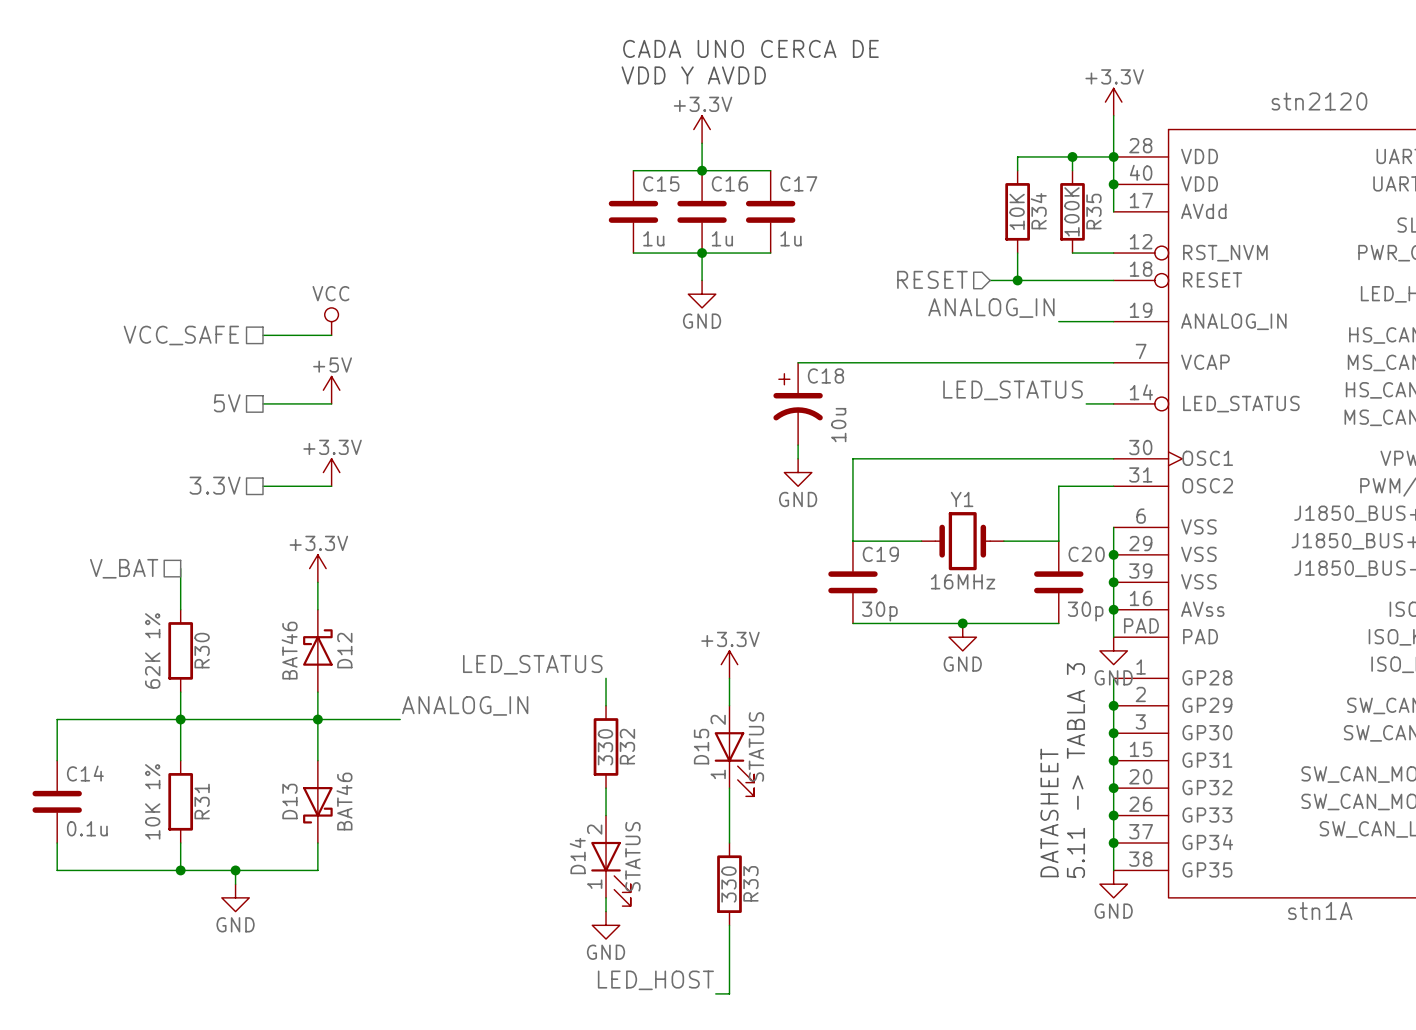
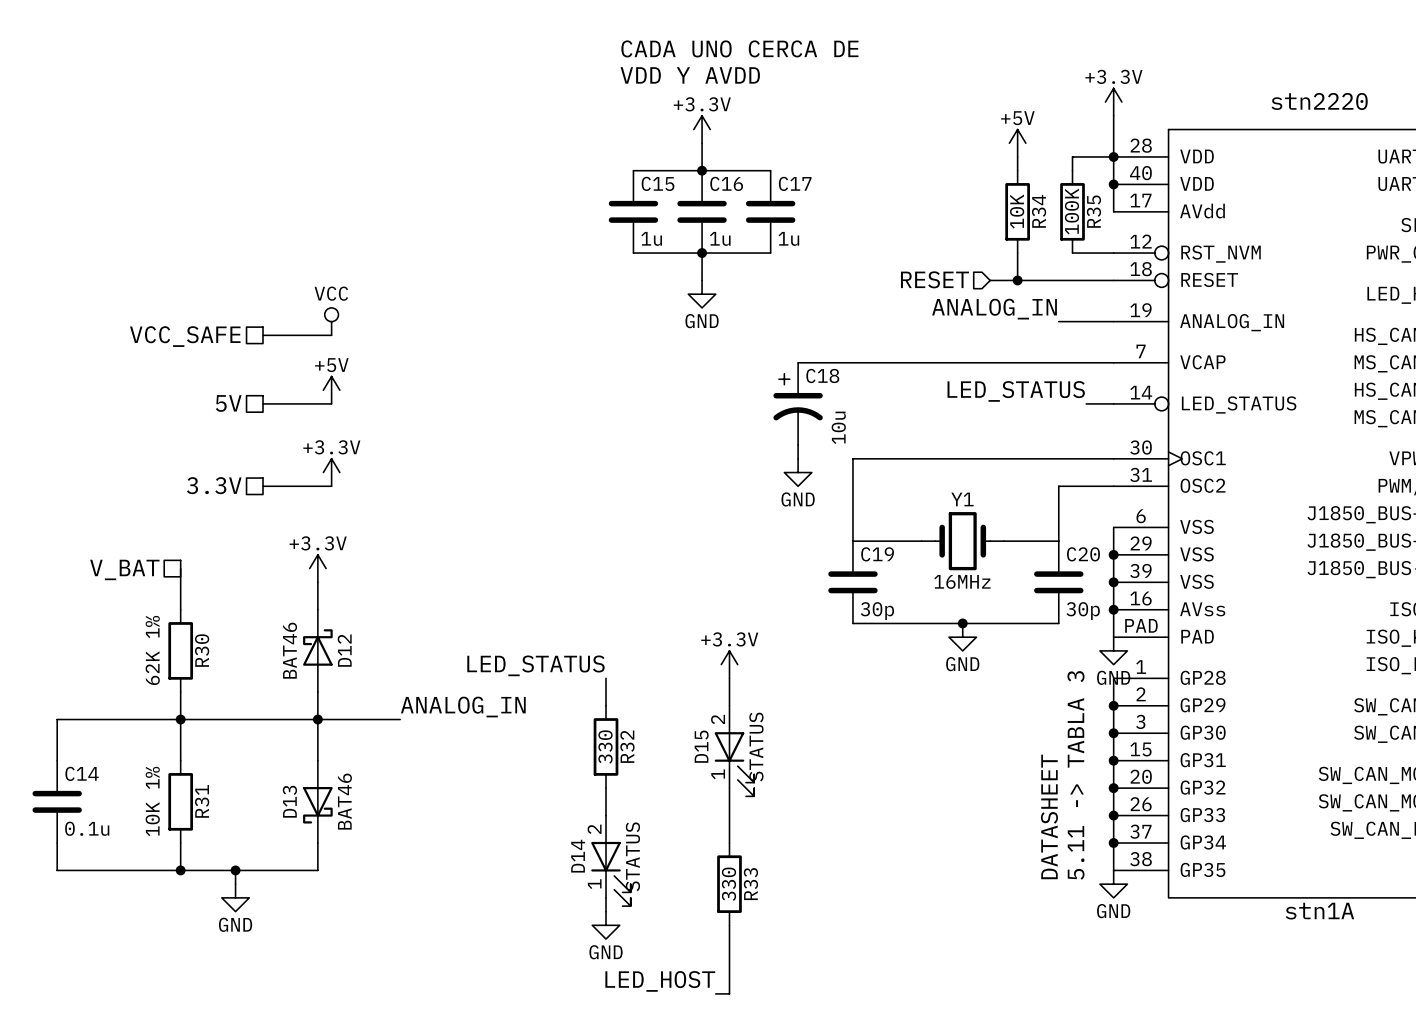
stn1A value: stn2120 (1319, 101) -> stn2220 (1319, 101)
power symbol: none -> +5V (1017, 143)
wire: (1017, 156) (1072, 156) -> none
junction: (1072, 156) -> none

